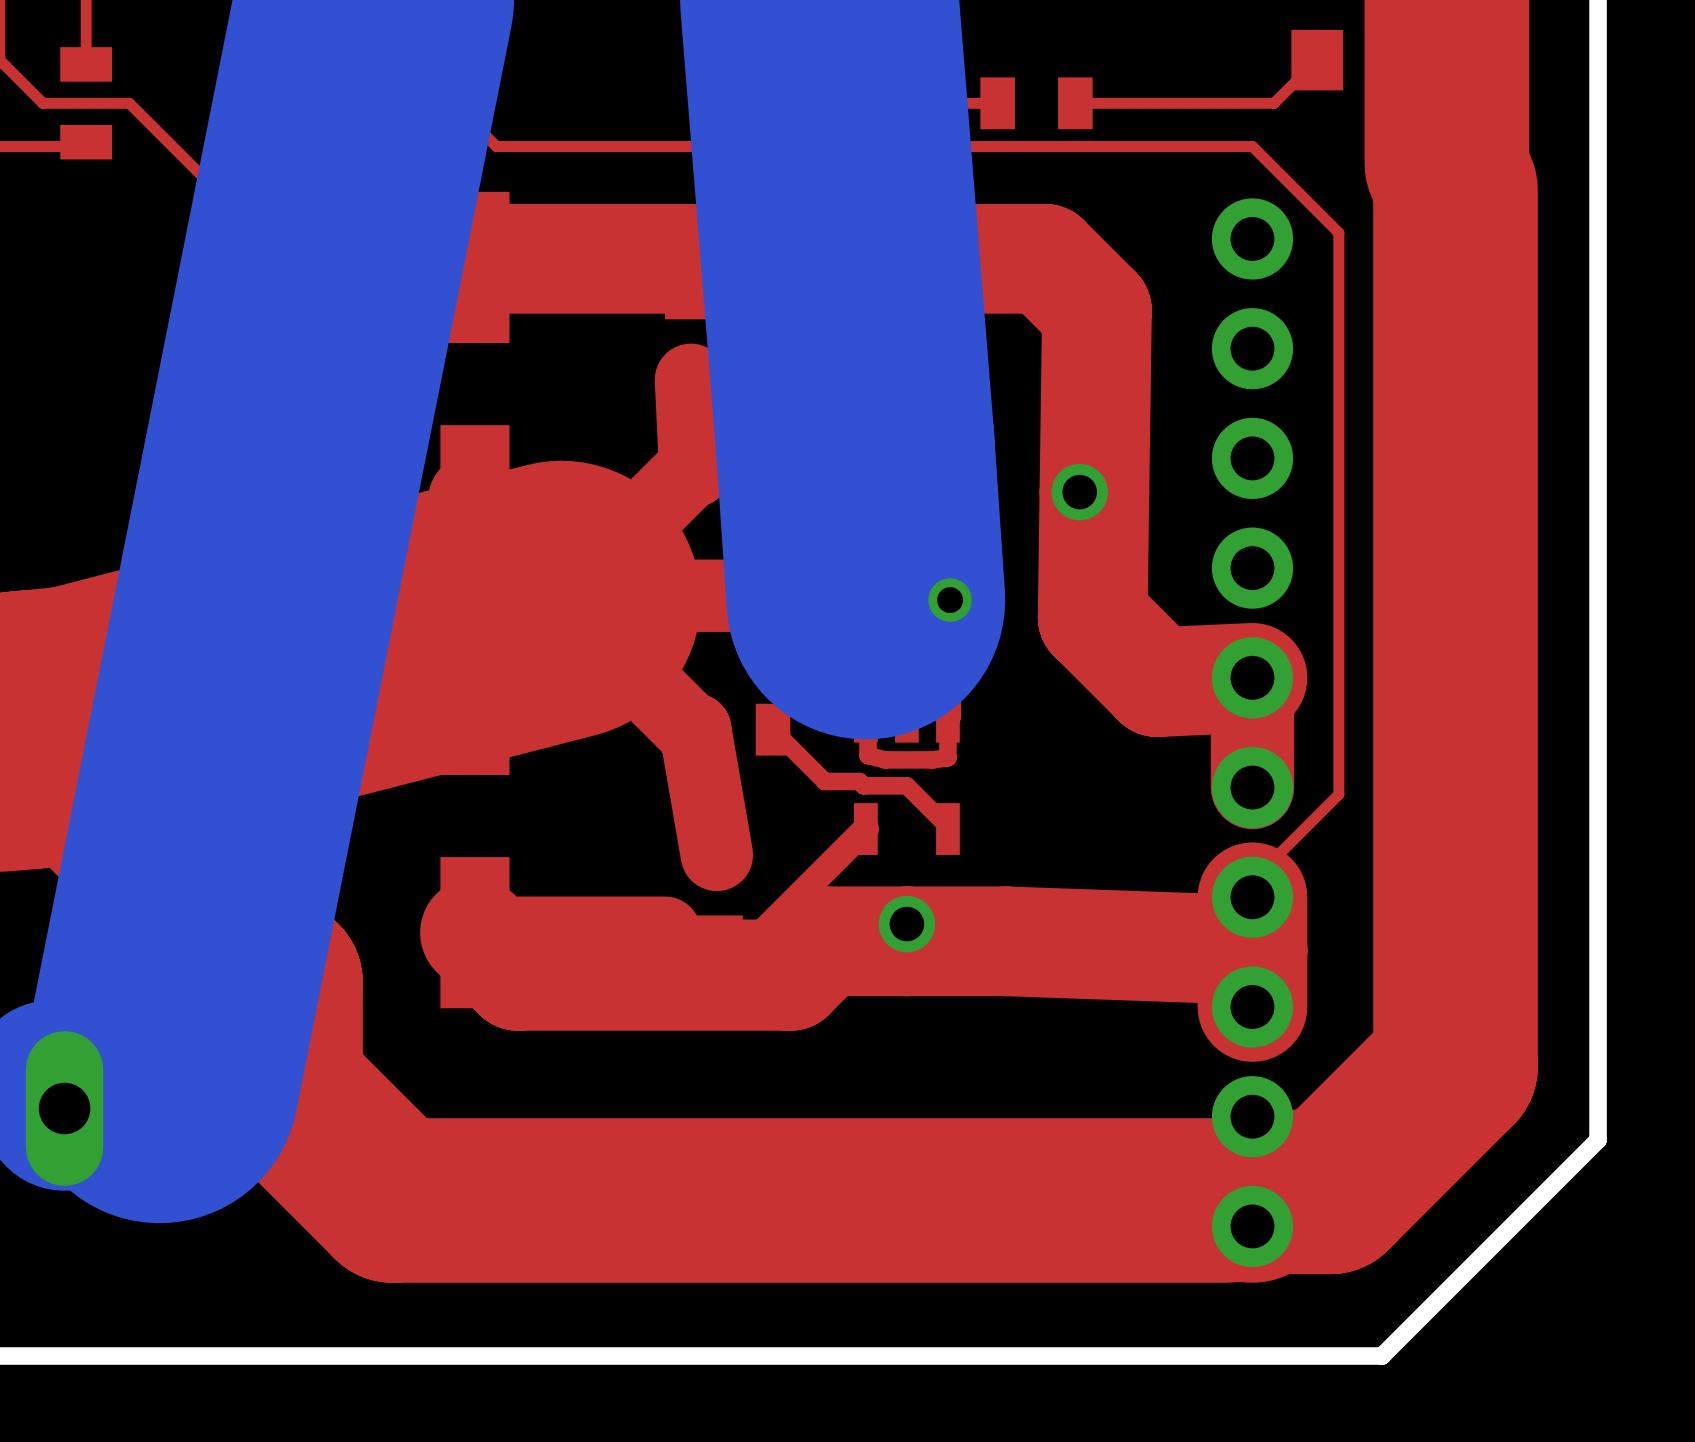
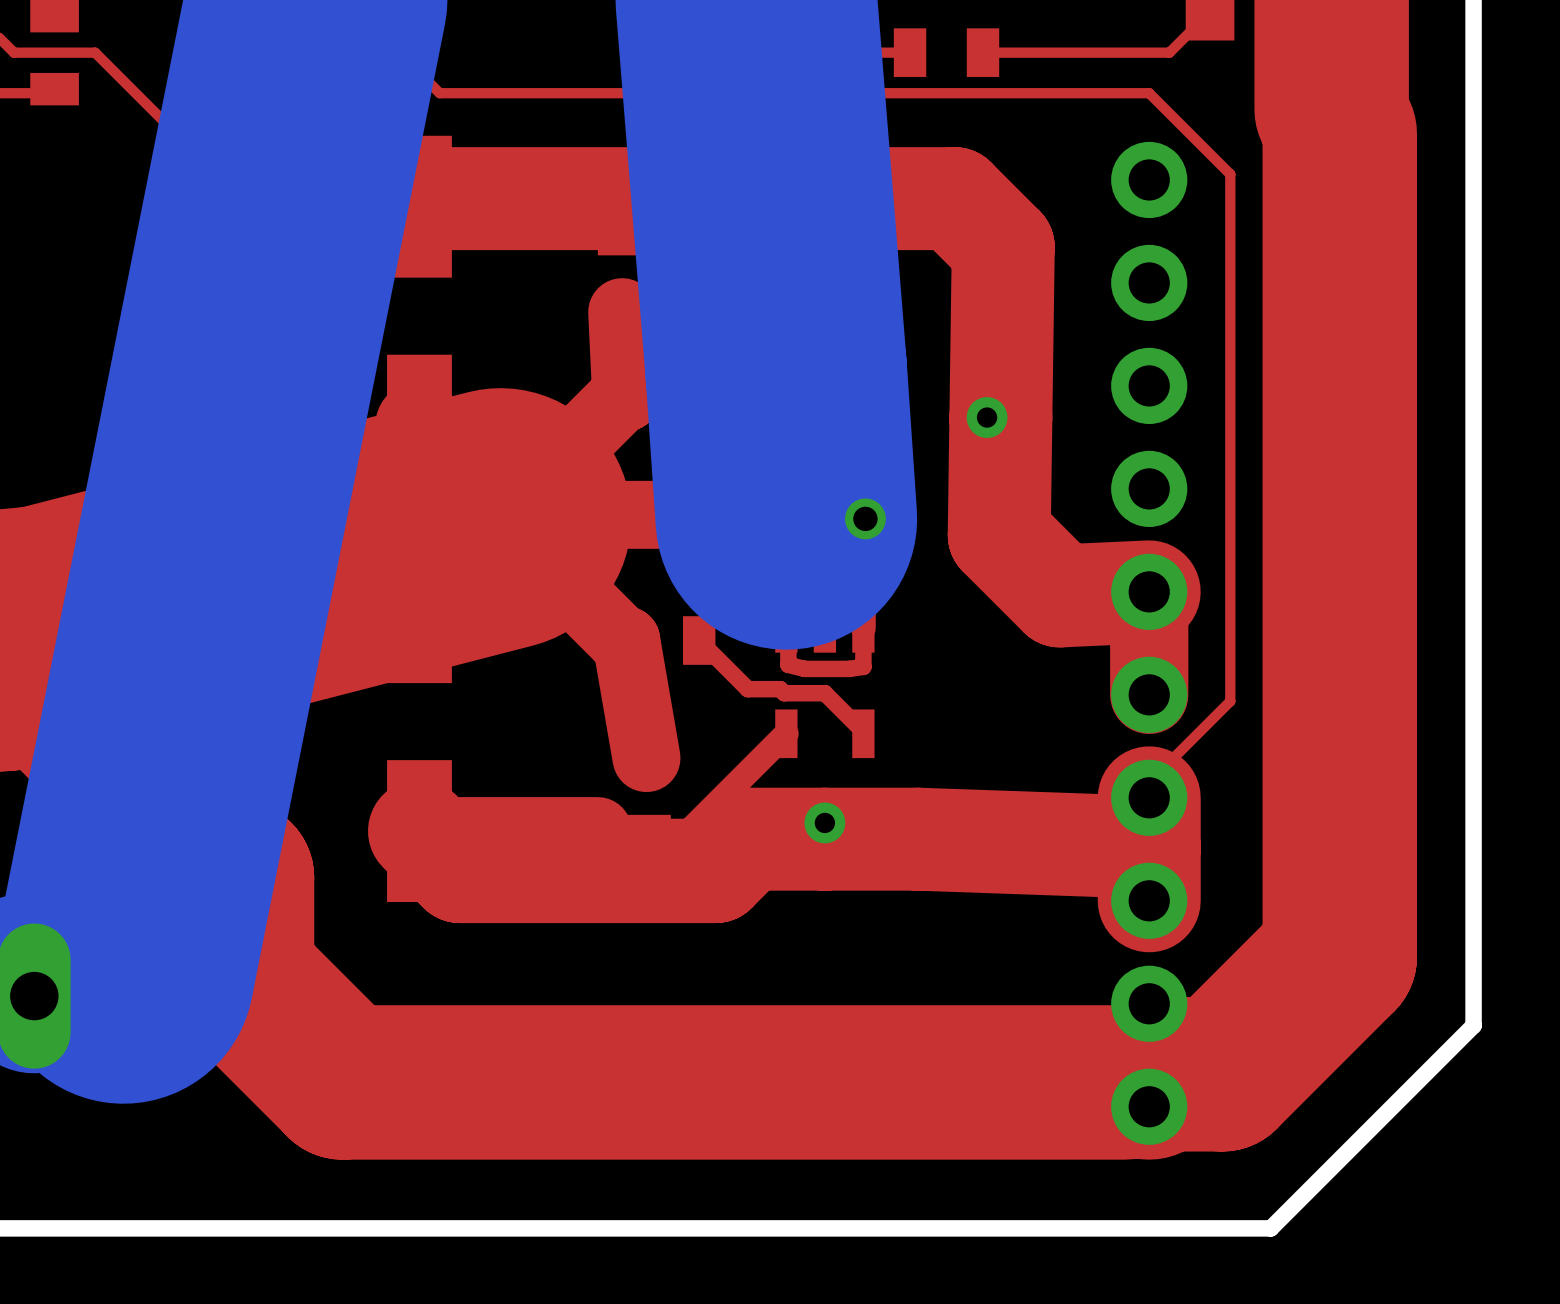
part footprint: [1051, 463, 1108, 521] -> [966, 397, 1008, 438]
part footprint: [878, 895, 936, 953] -> [804, 802, 846, 844]

